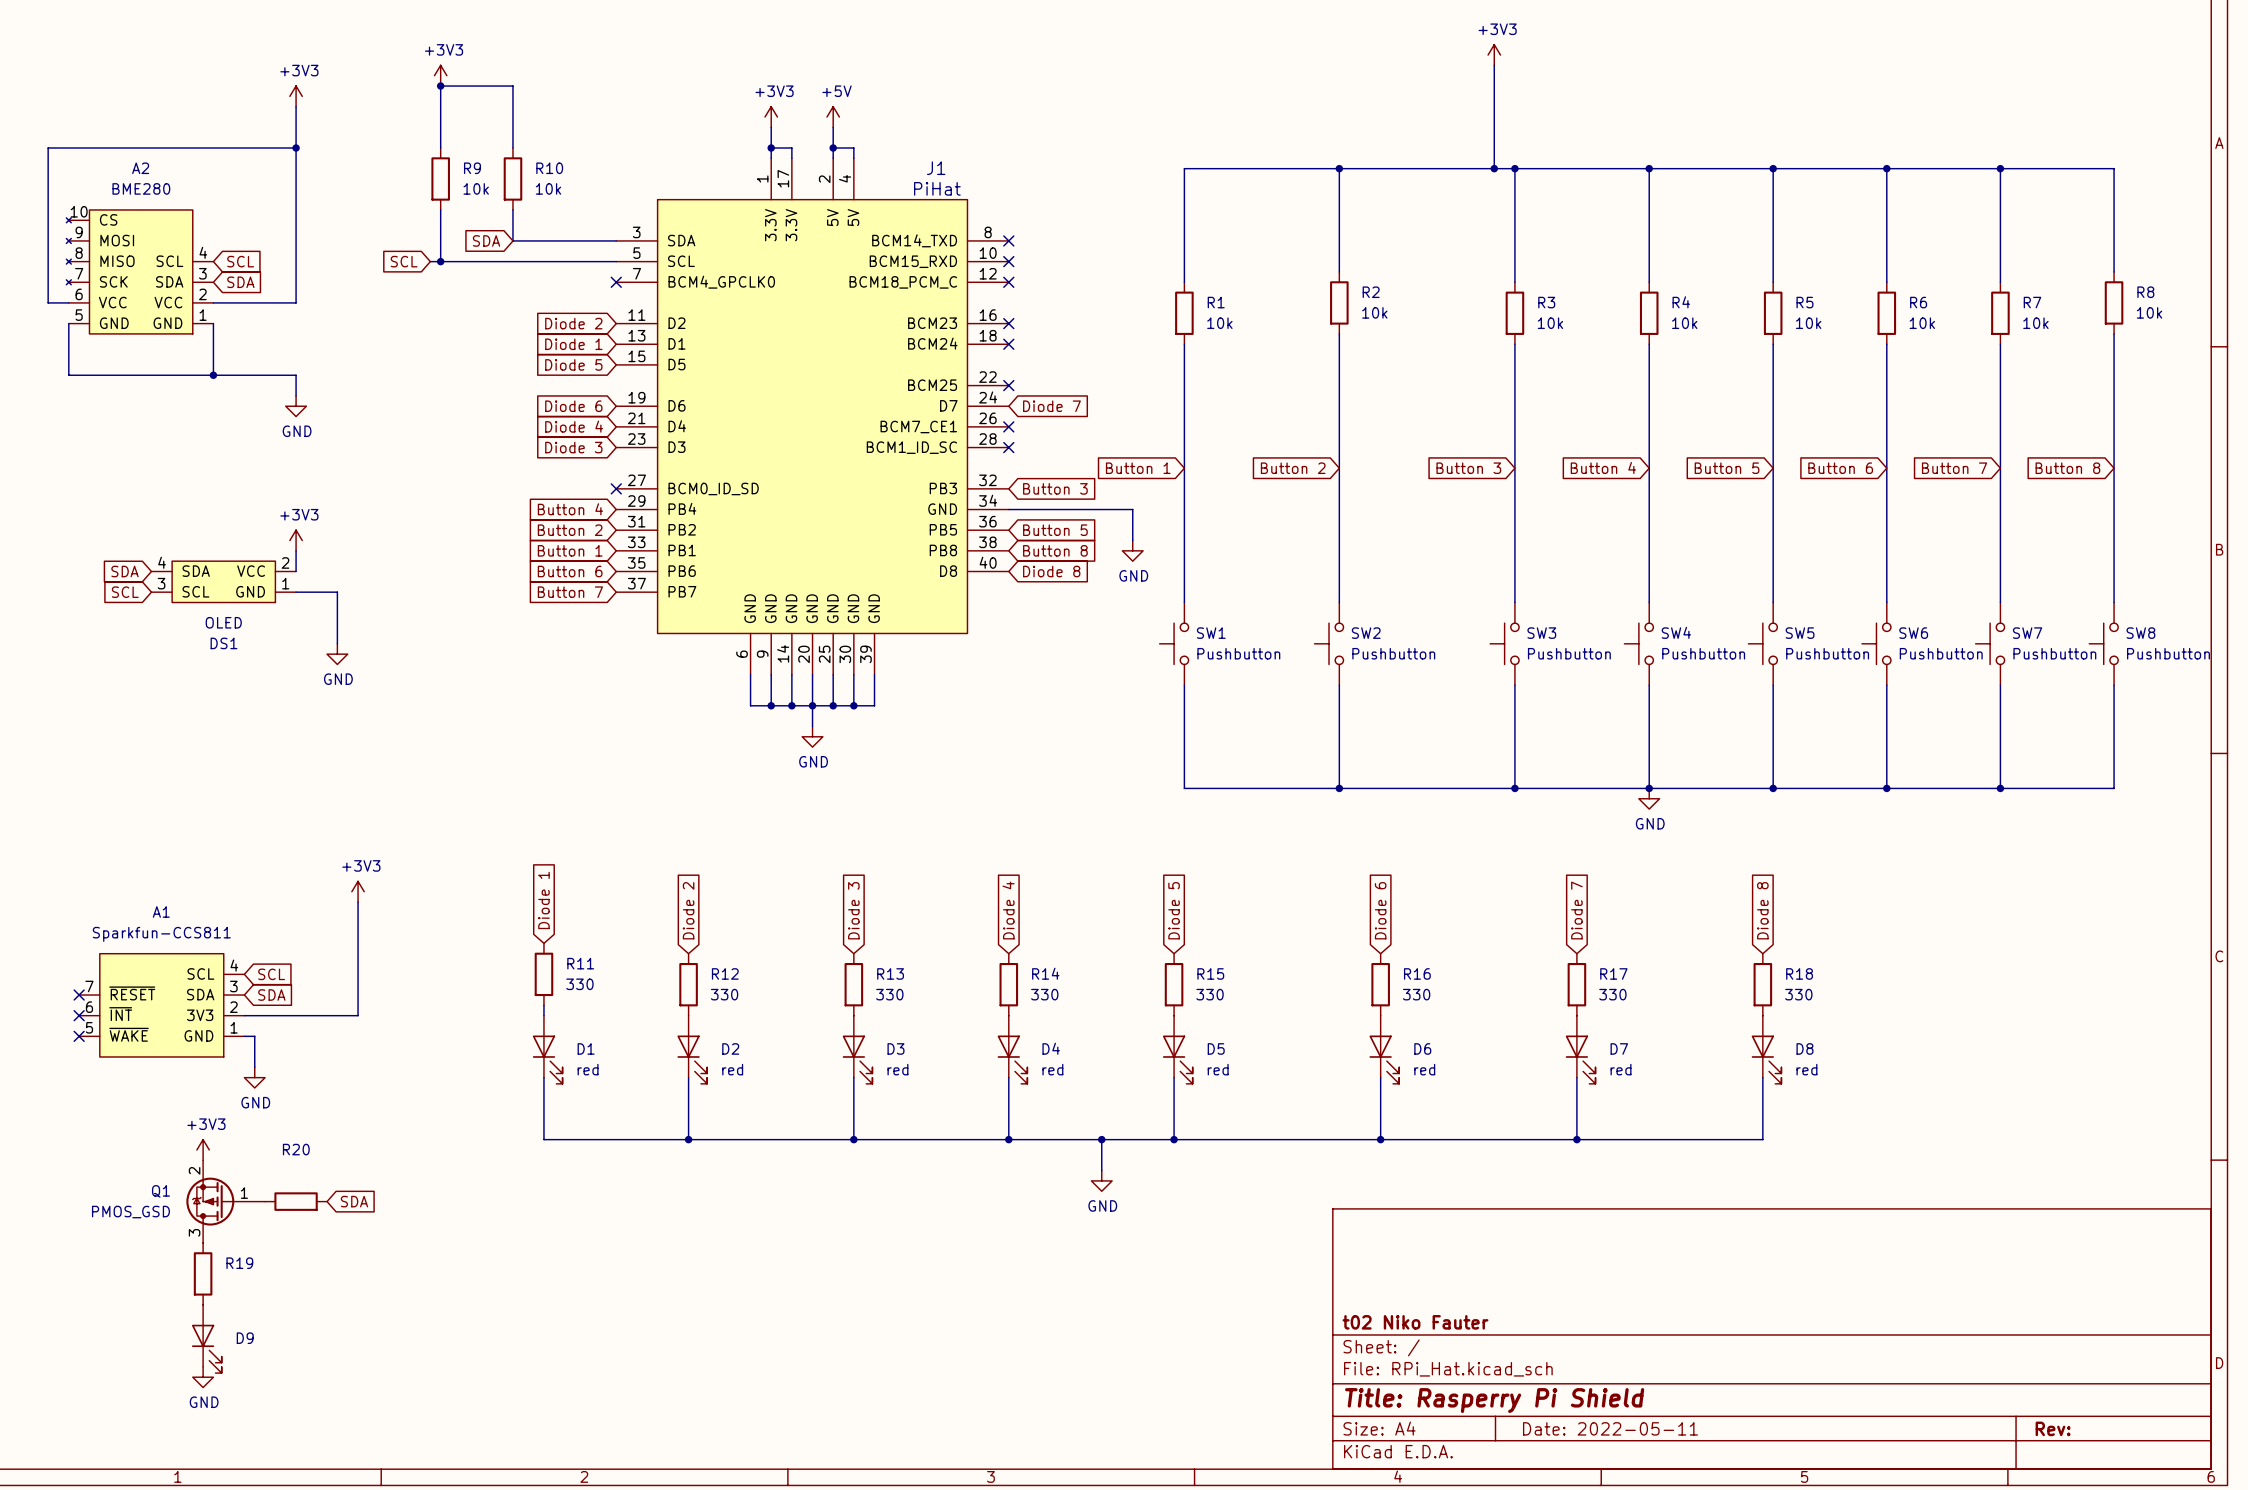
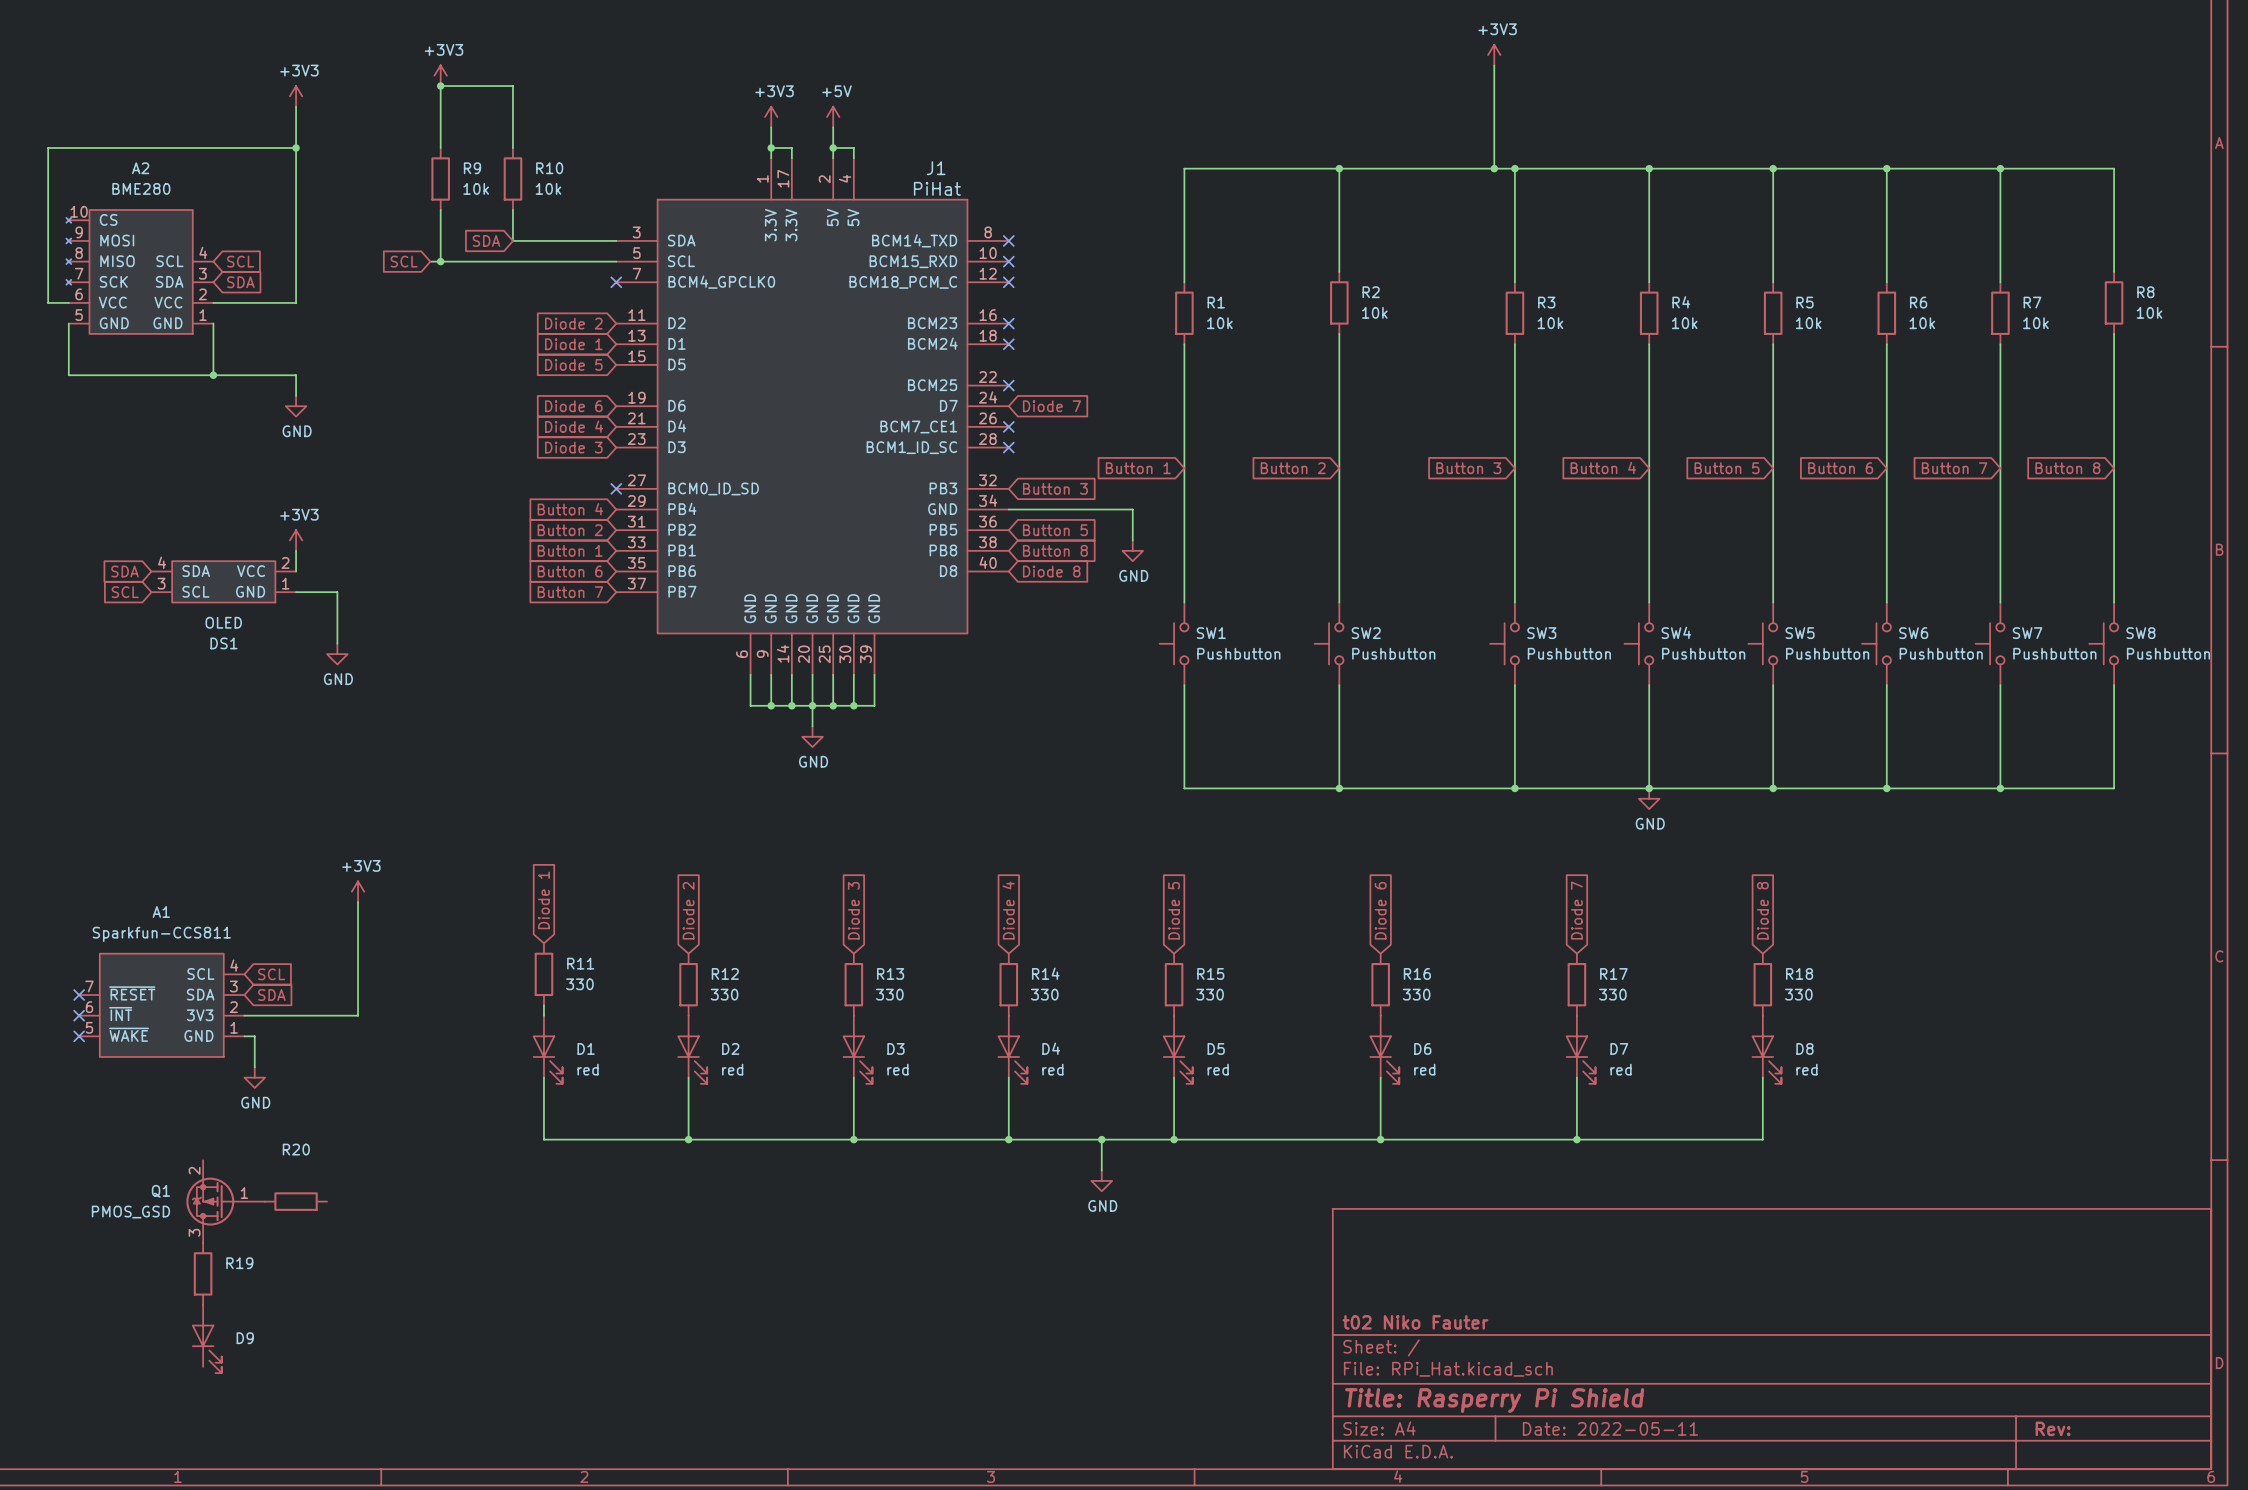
power symbol: +3V3 (203, 1149) -> none
global label: SDA (354, 1201) -> none
power symbol: GND (203, 1377) -> none

